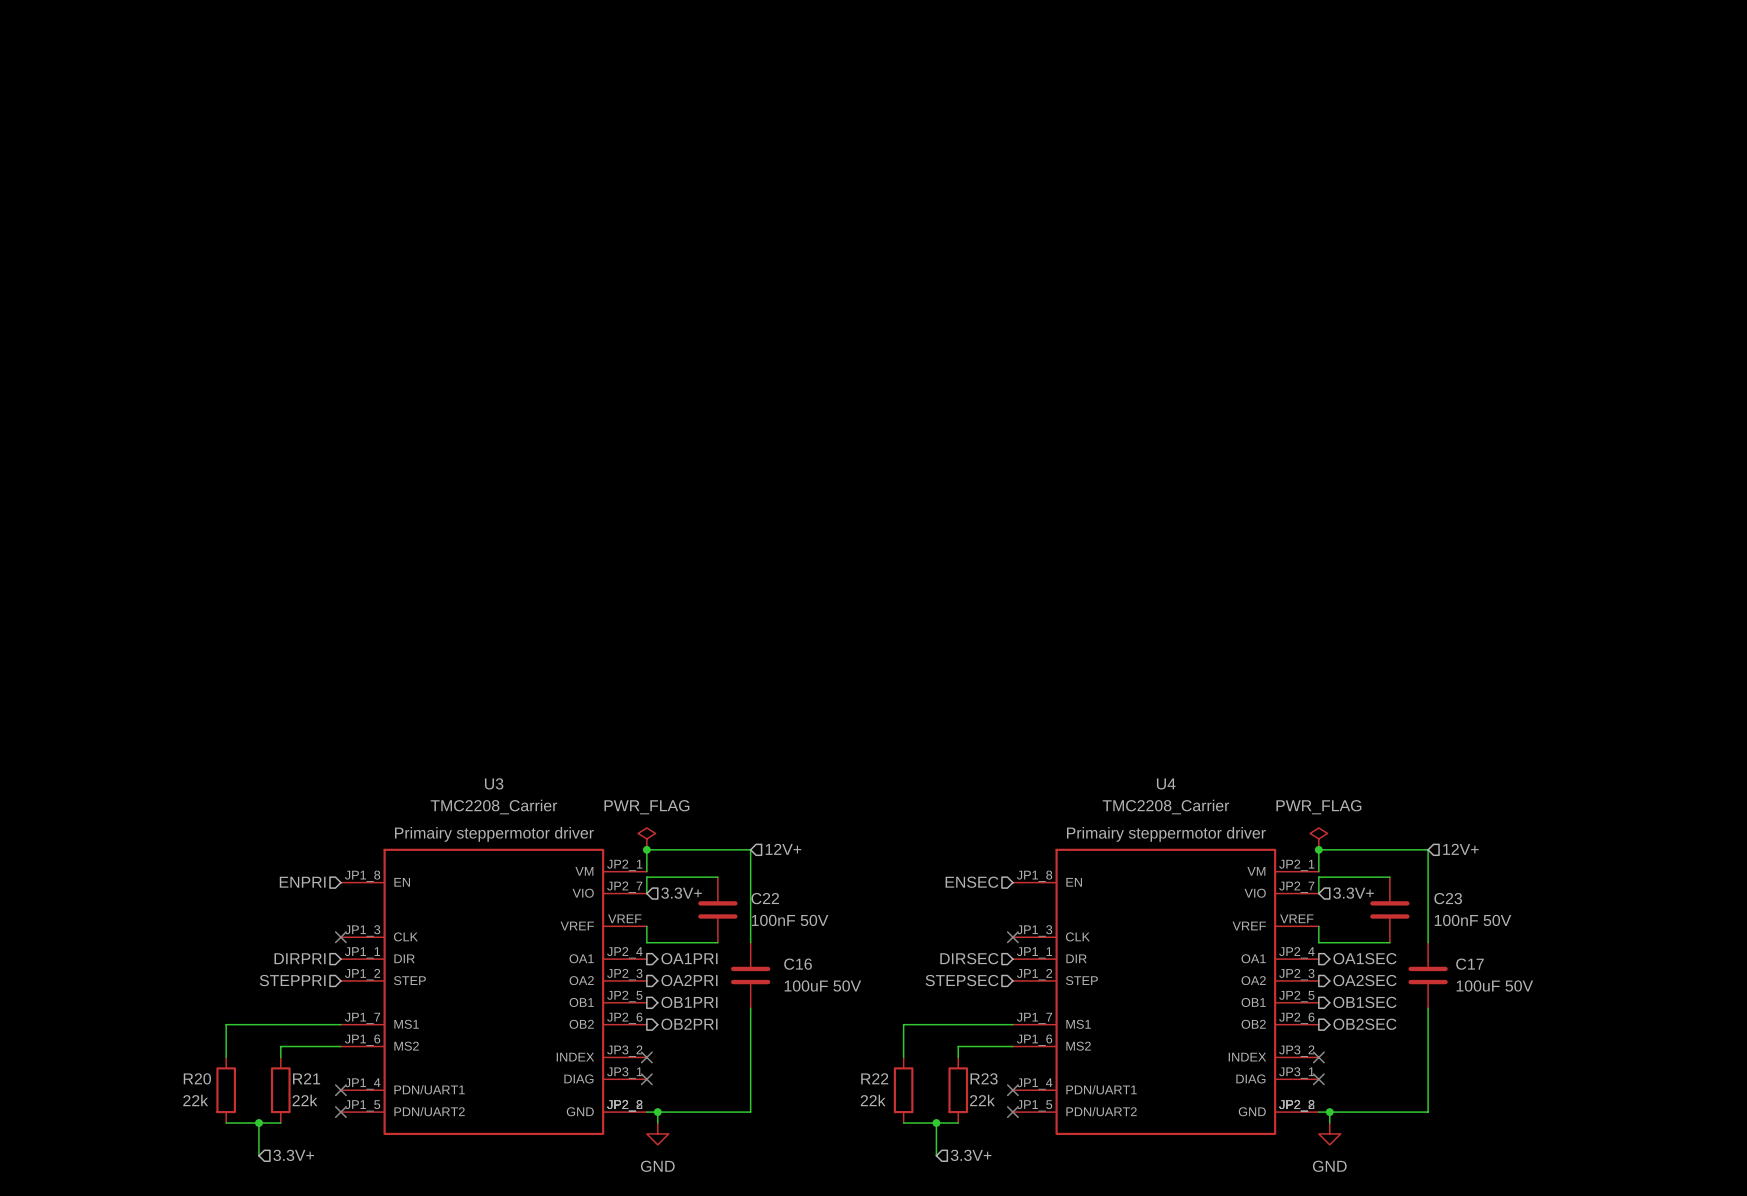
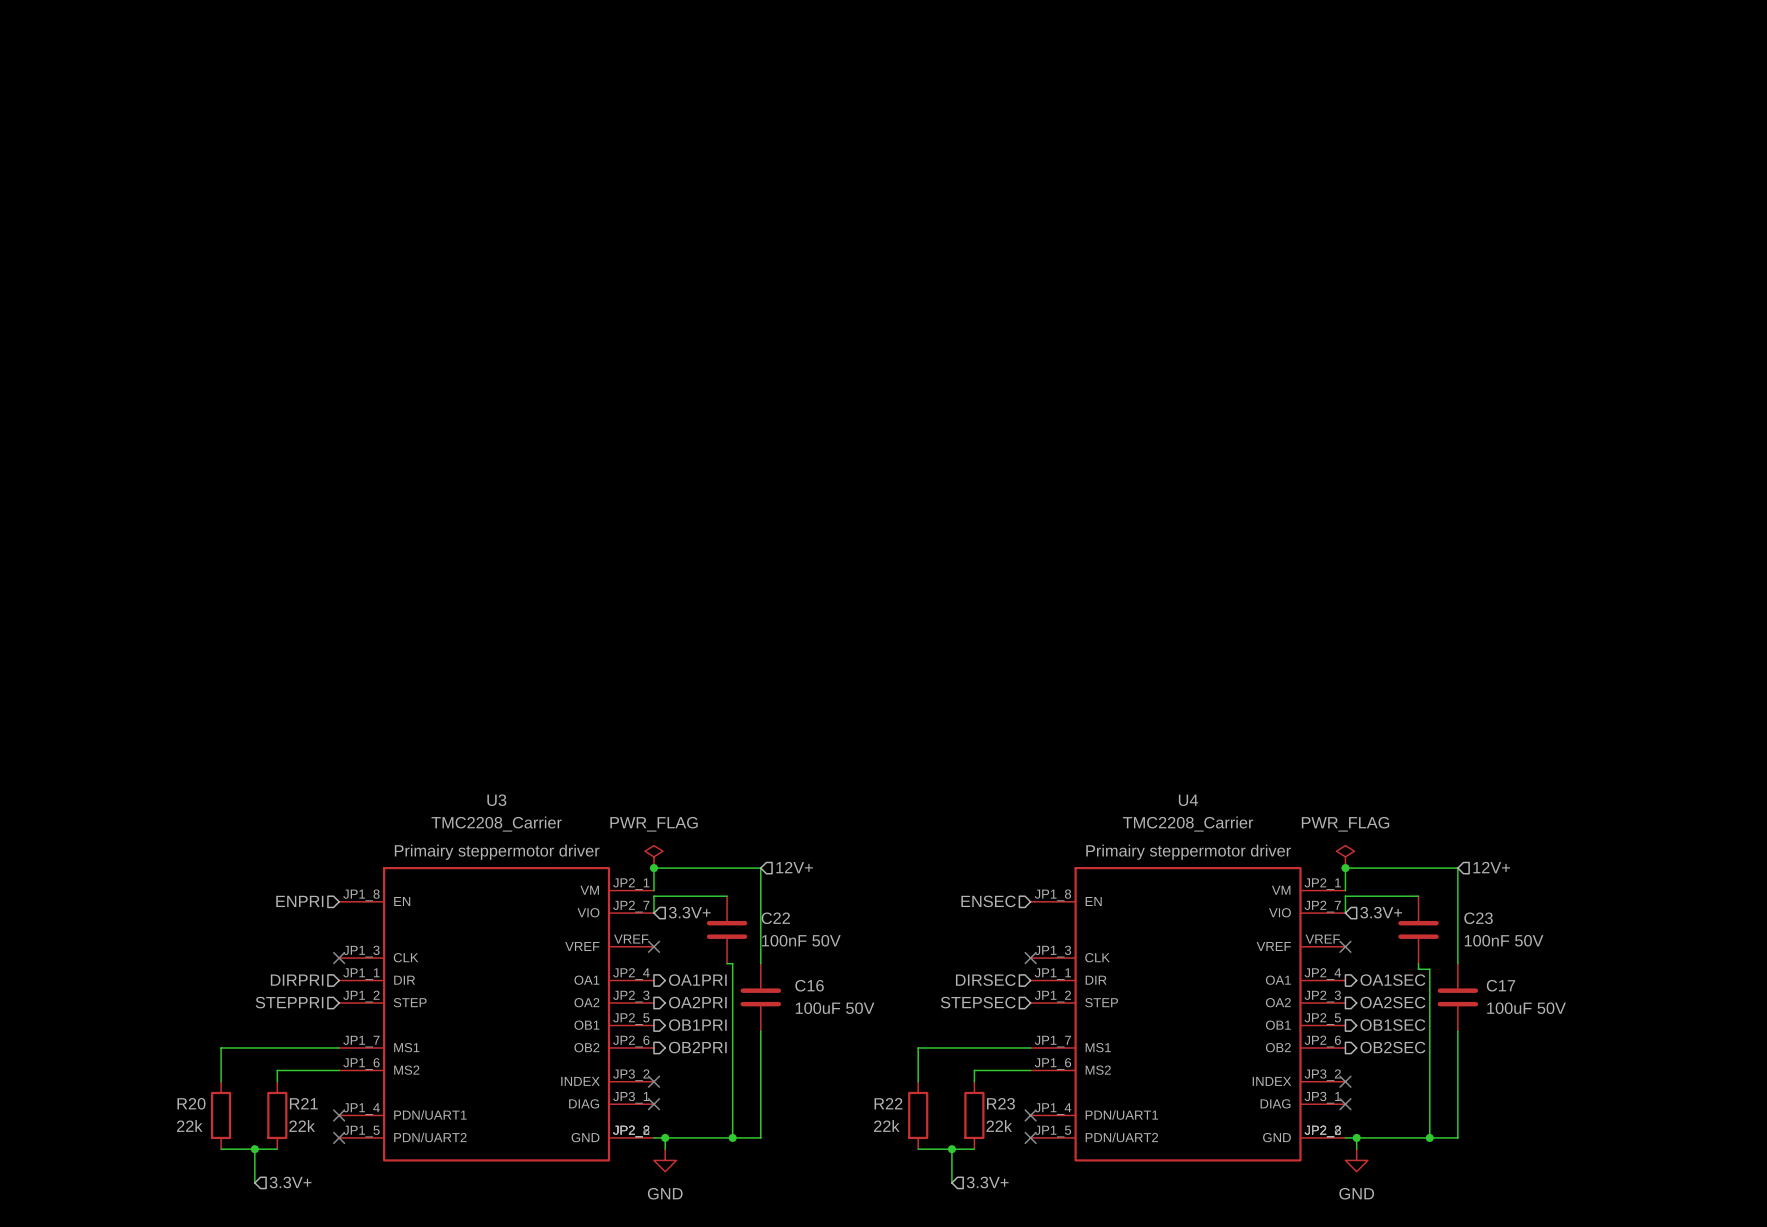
wire: (646, 926) (646, 942) (717, 942) -> (732, 1137) (732, 963) (727, 963)
no-connect mark: none -> (653, 946)
wire: (1318, 926) (1318, 942) (1389, 942) -> (1429, 1137) (1429, 969) (1418, 969) (1418, 963)
no-connect mark: none -> (1345, 946)
junction: none -> (732, 1137)
junction: none -> (1429, 1137)

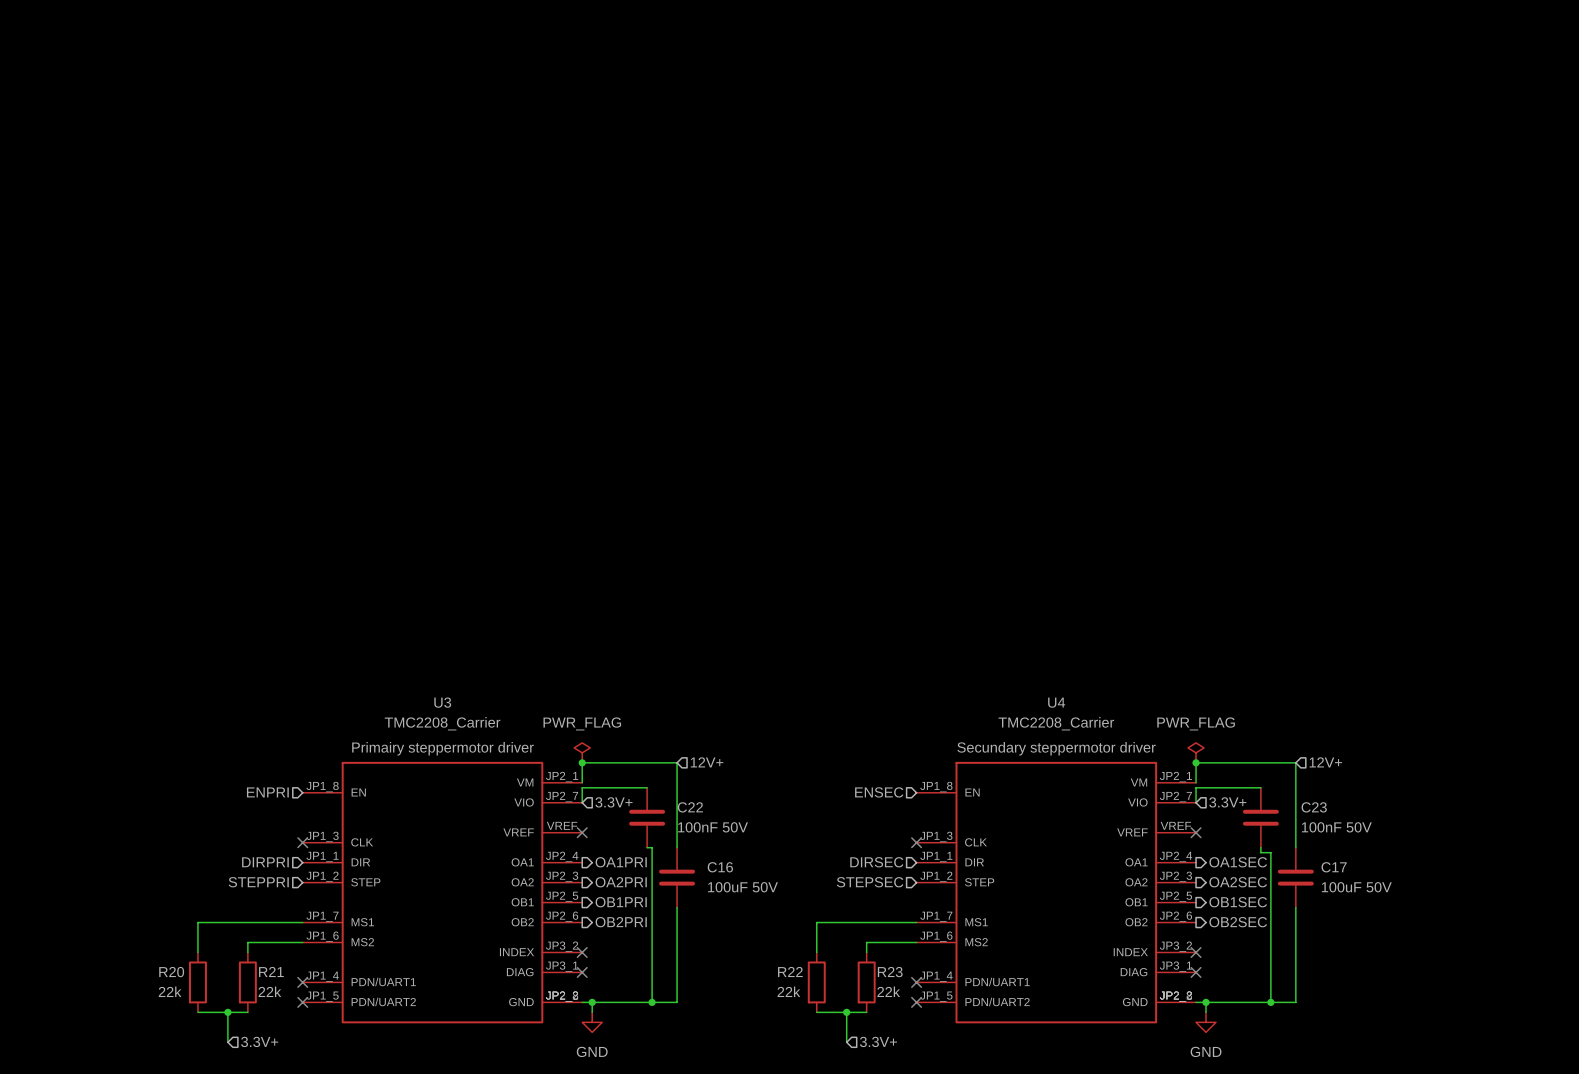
U4 text: Primairy steppermotor driver (1188, 852) -> Secundary steppermotor driver (1056, 748)

